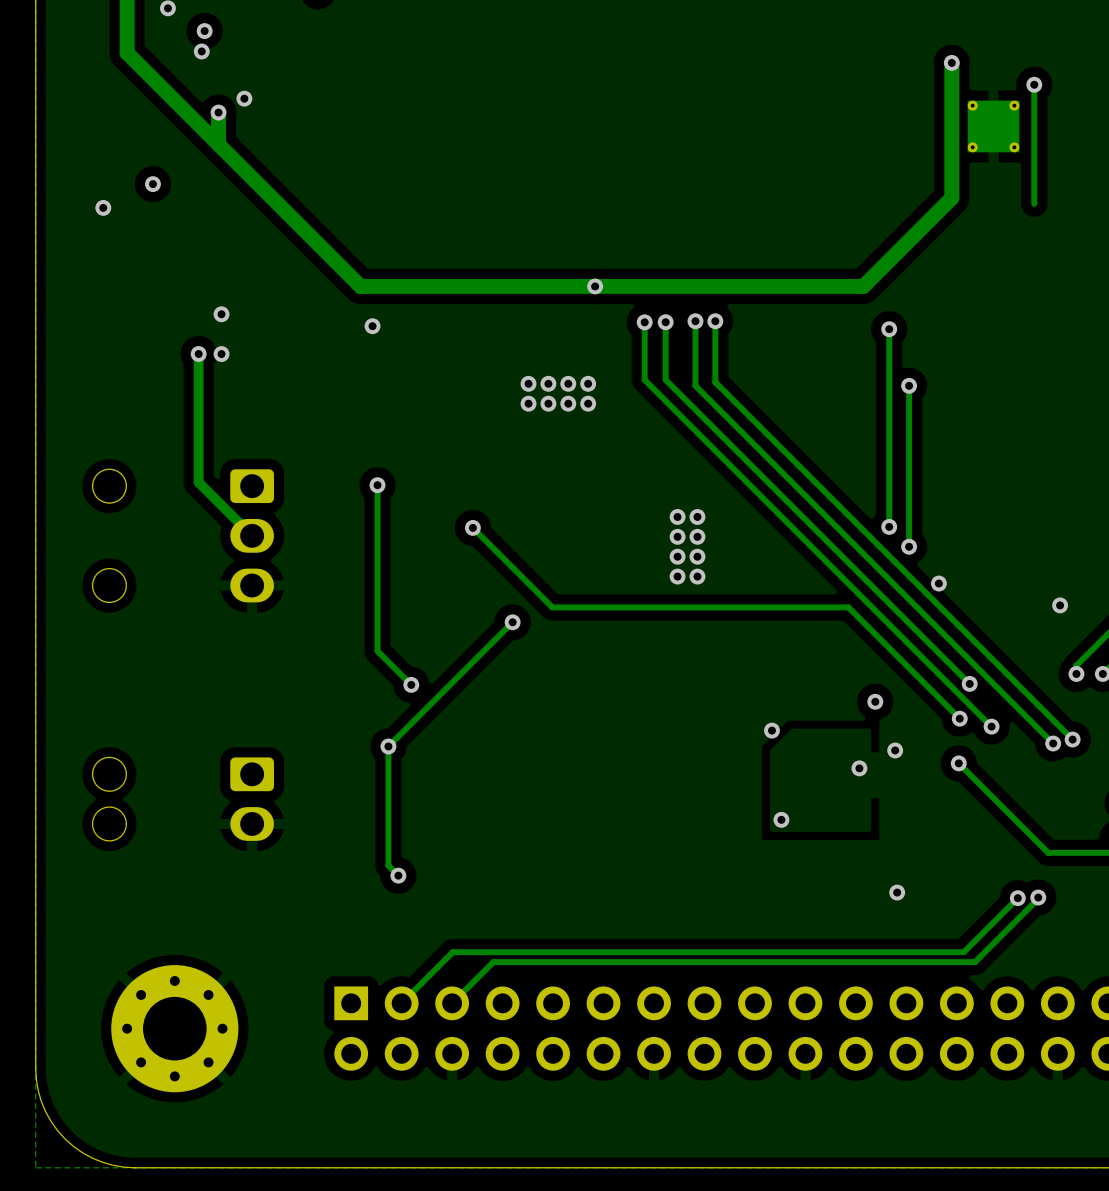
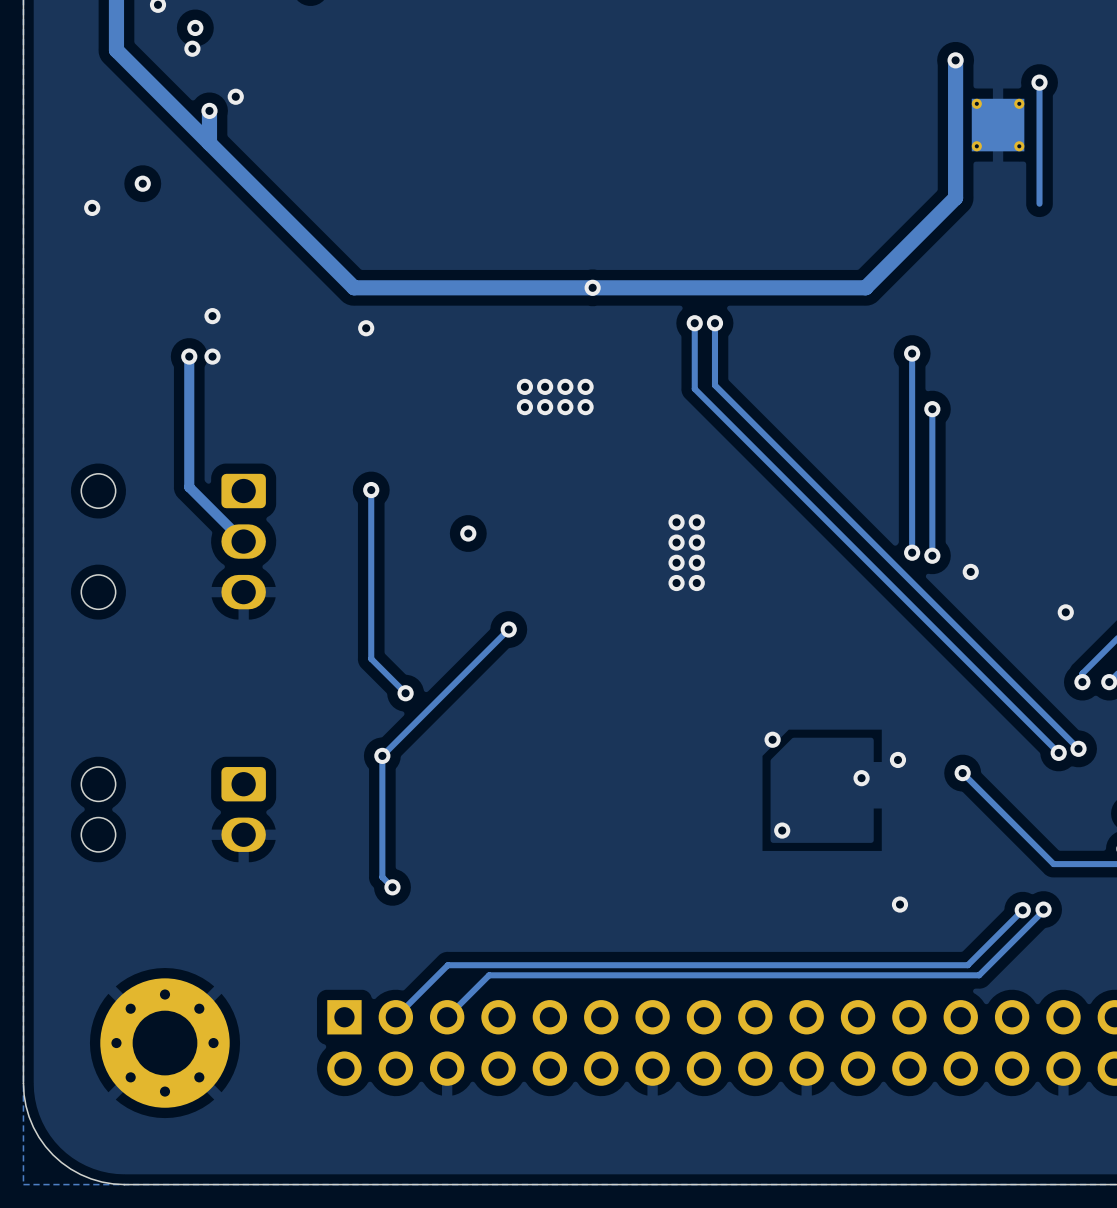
track: (644, 322) (644, 379) (991, 726) -> none
via: (644, 322) -> none
track: (665, 322) (665, 379) (969, 683) -> none
via: (665, 322) -> none
track: (889, 329) (889, 524) -> none
via: (889, 329) -> none
via: none -> (912, 353)
via: (909, 385) -> none
track: none -> (932, 409) (932, 555)
via: none -> (932, 409)
via: (889, 526) -> none
track: (472, 527) (552, 607) (848, 607) (959, 718) -> none
via: none -> (932, 555)
via: none -> (970, 571)
via: (938, 583) -> none
via: (969, 683) -> none
via: (875, 701) -> none
via: (959, 718) -> none
via: (991, 726) -> none

